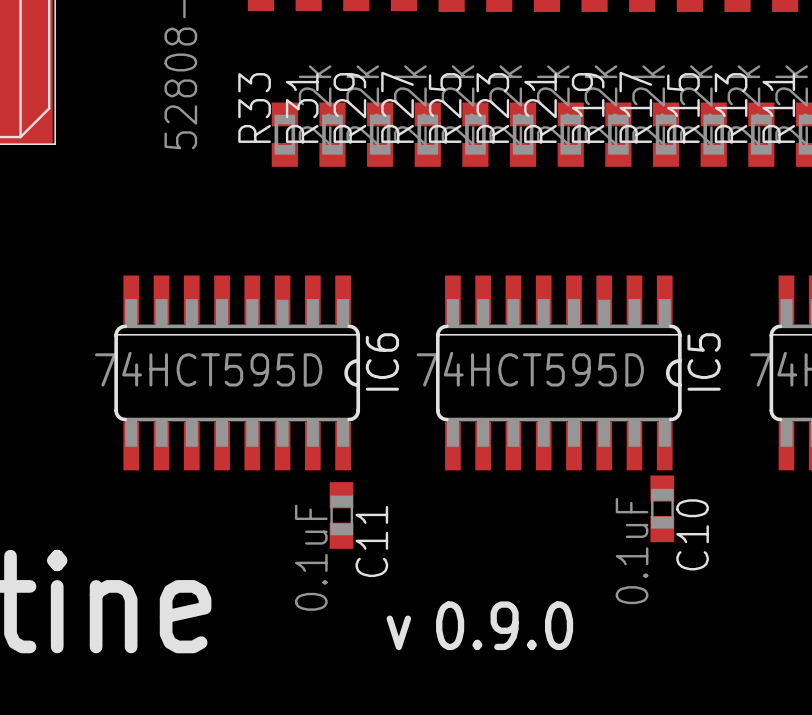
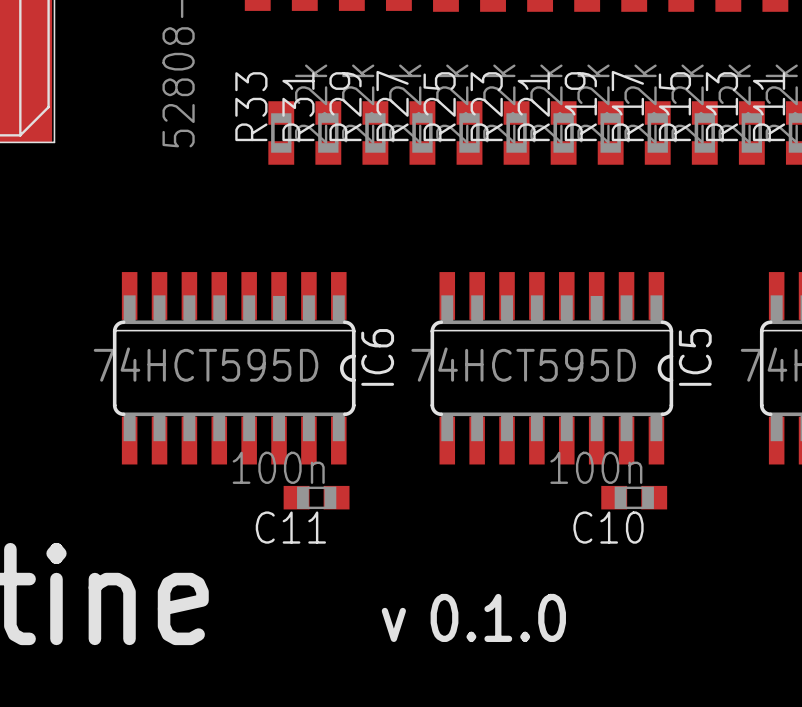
C10 rotation: 0° (662, 508) -> 90° clockwise (634, 497)
C11 rotation: 0° (341, 515) -> 90° clockwise (316, 497)
C10 value: 0.1uF (632, 551) -> 100n (596, 467)
C11 value: 0.1uF (311, 557) -> 100n (278, 467)
text: 0.9.0 (504, 625) -> 0.1.0 (498, 617)

